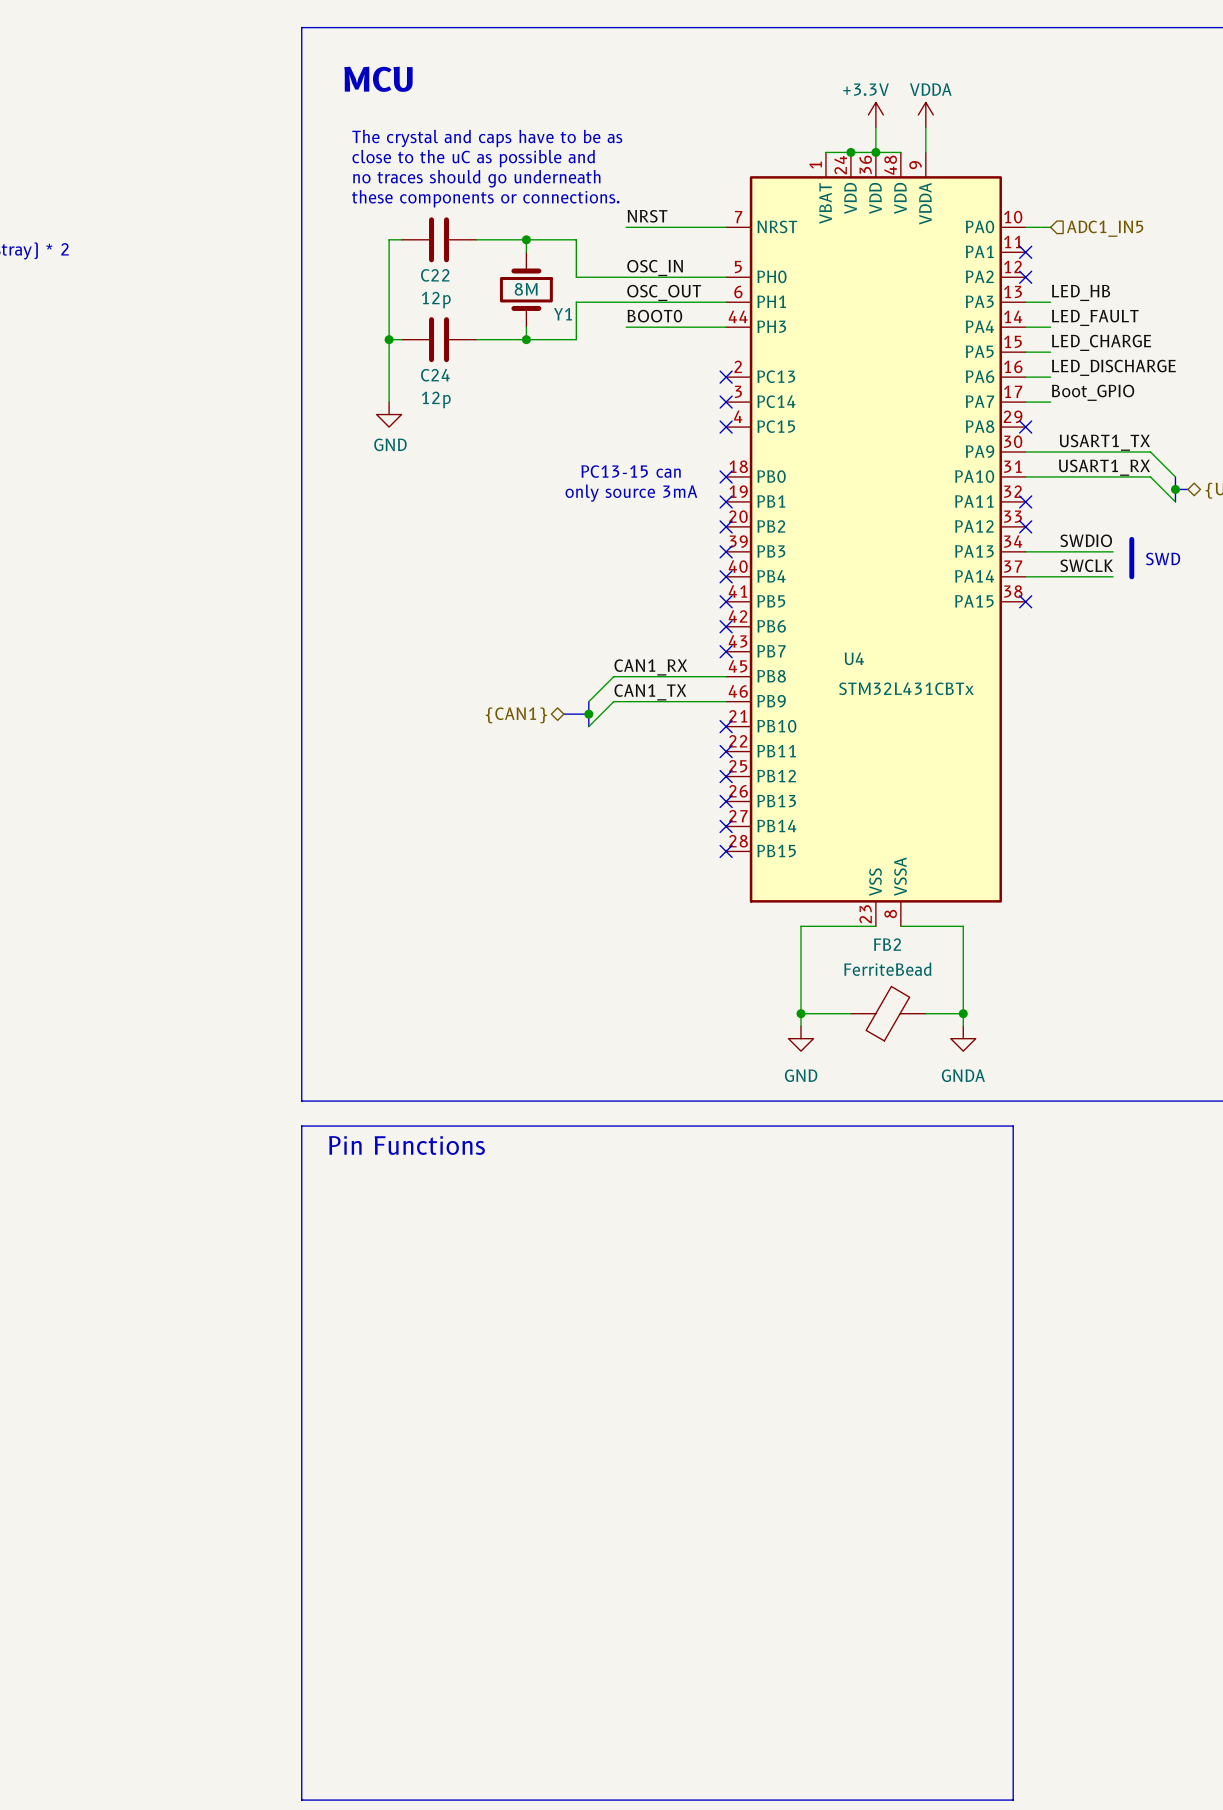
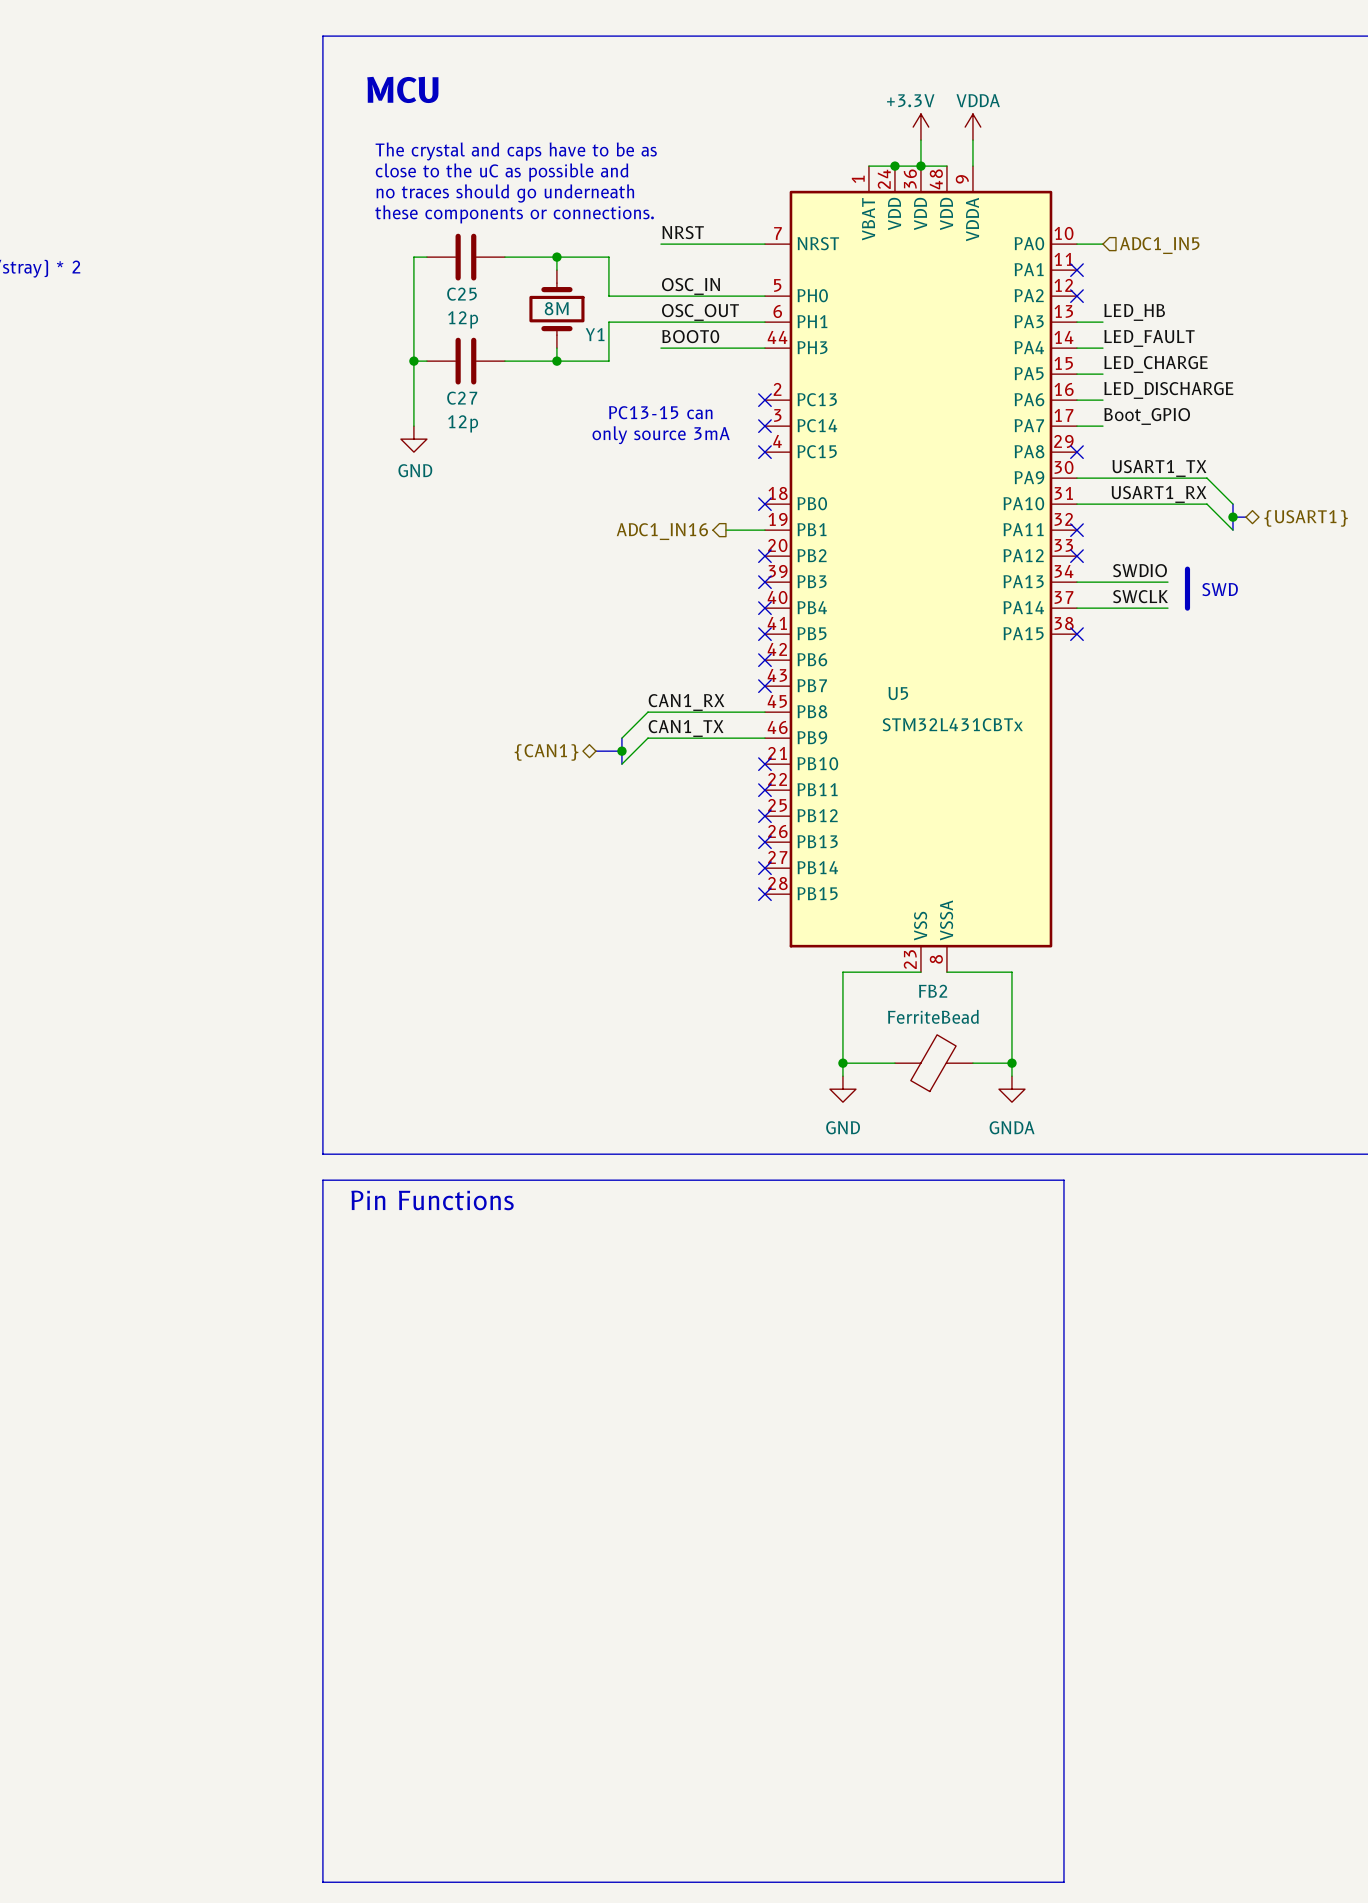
C22 name: C22 (435, 275) -> C25 (461, 294)
C24 name: C24 (435, 375) -> C27 (462, 398)
text position: PC13-15 can (631, 471) -> PC13-15 can (660, 412)
text position: only source 3mA (631, 493) -> only source 3mA (661, 435)
wire: none -> (725, 530) (764, 530)
no-connect mark: (726, 501) -> none
hierarchical label: none -> ADC1_IN16 (662, 531)
U4 name: U4 (854, 658) -> U5 (898, 693)

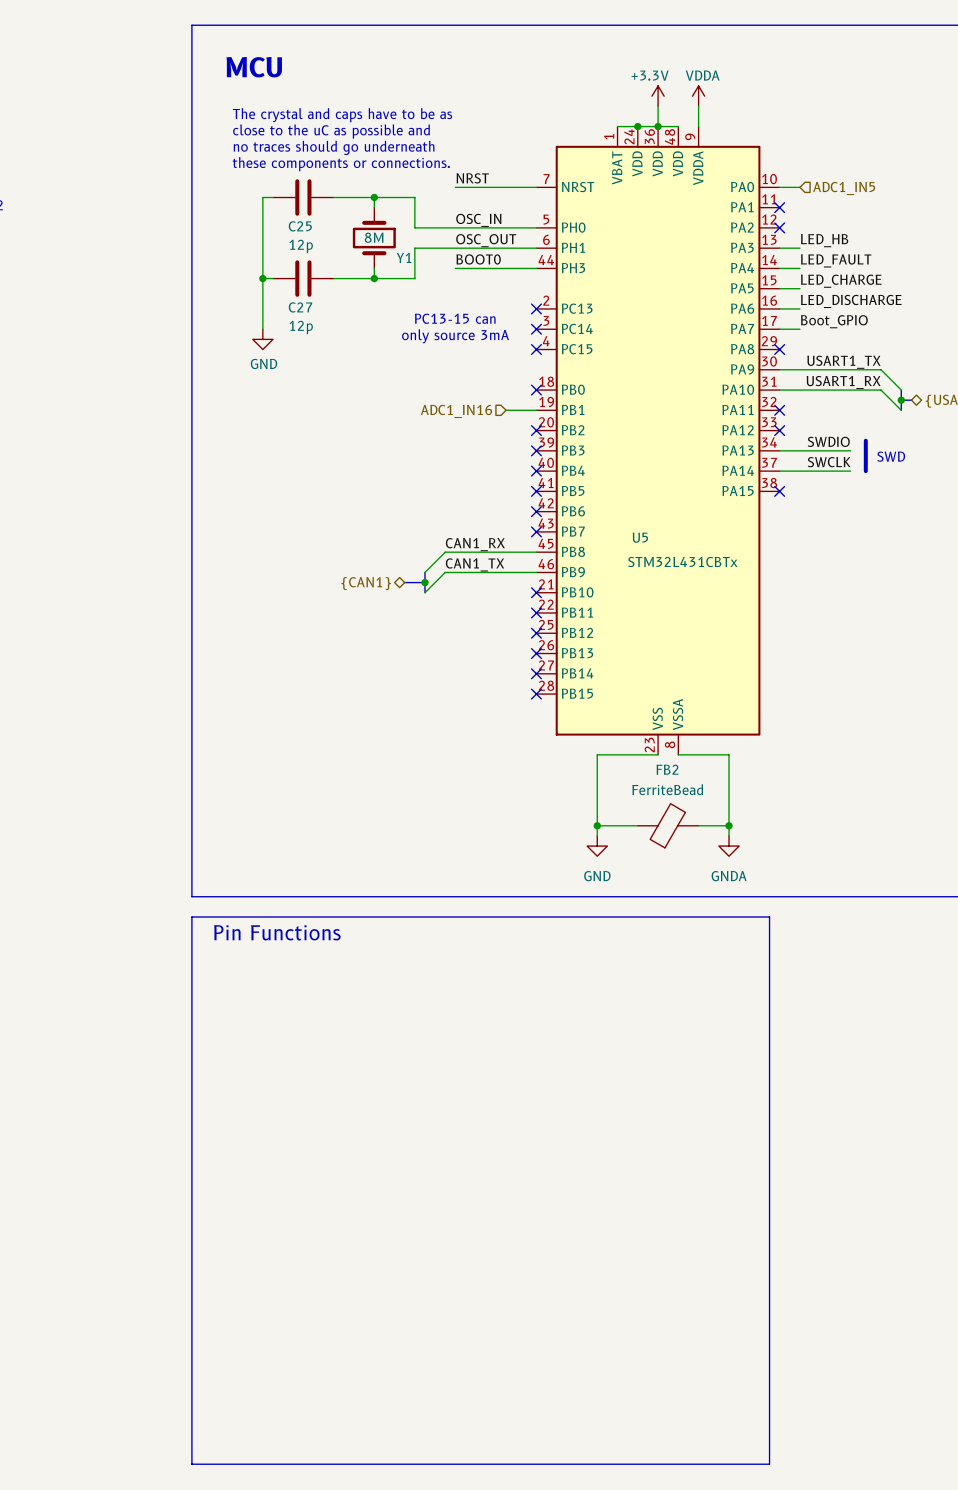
hierarchical label shape: output (662, 531) -> input (456, 411)

